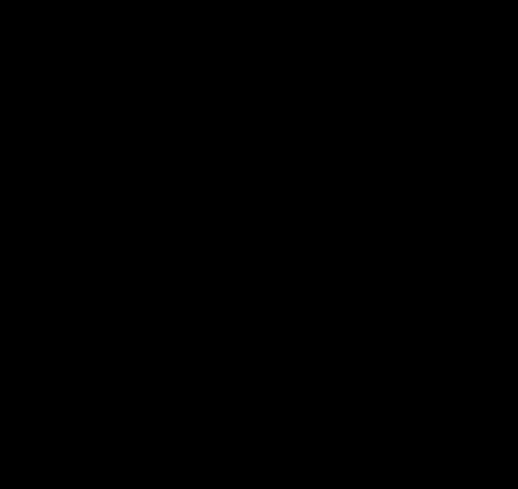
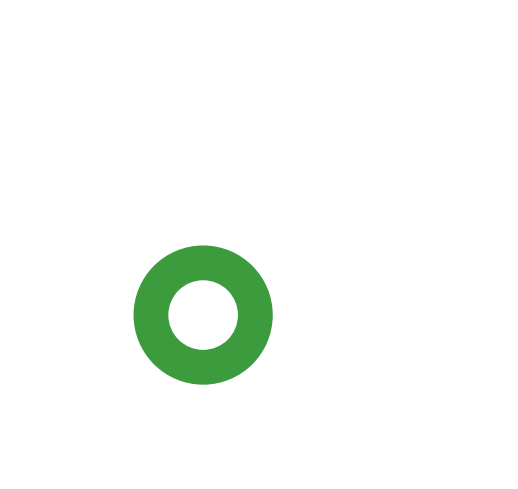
part: none -> (203, 315)

